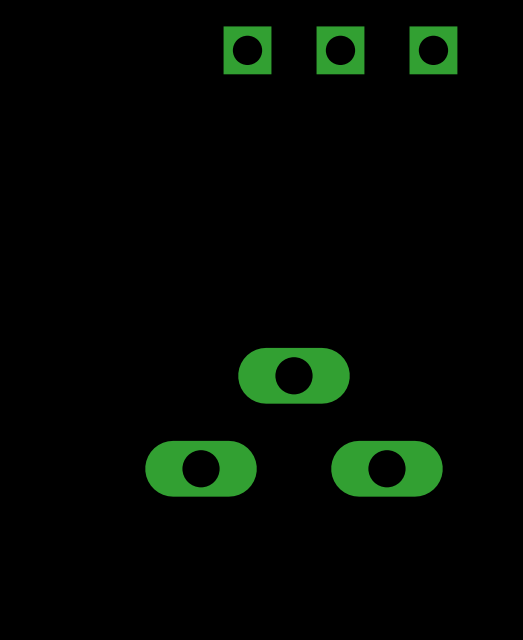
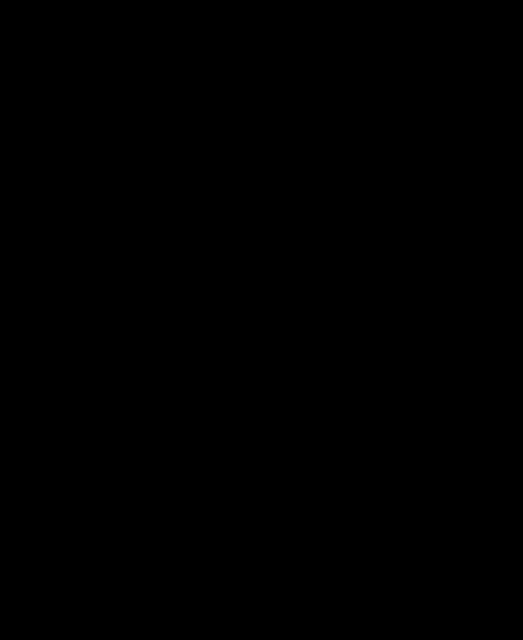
part: (340, 50) -> none
part: (293, 422) -> none

